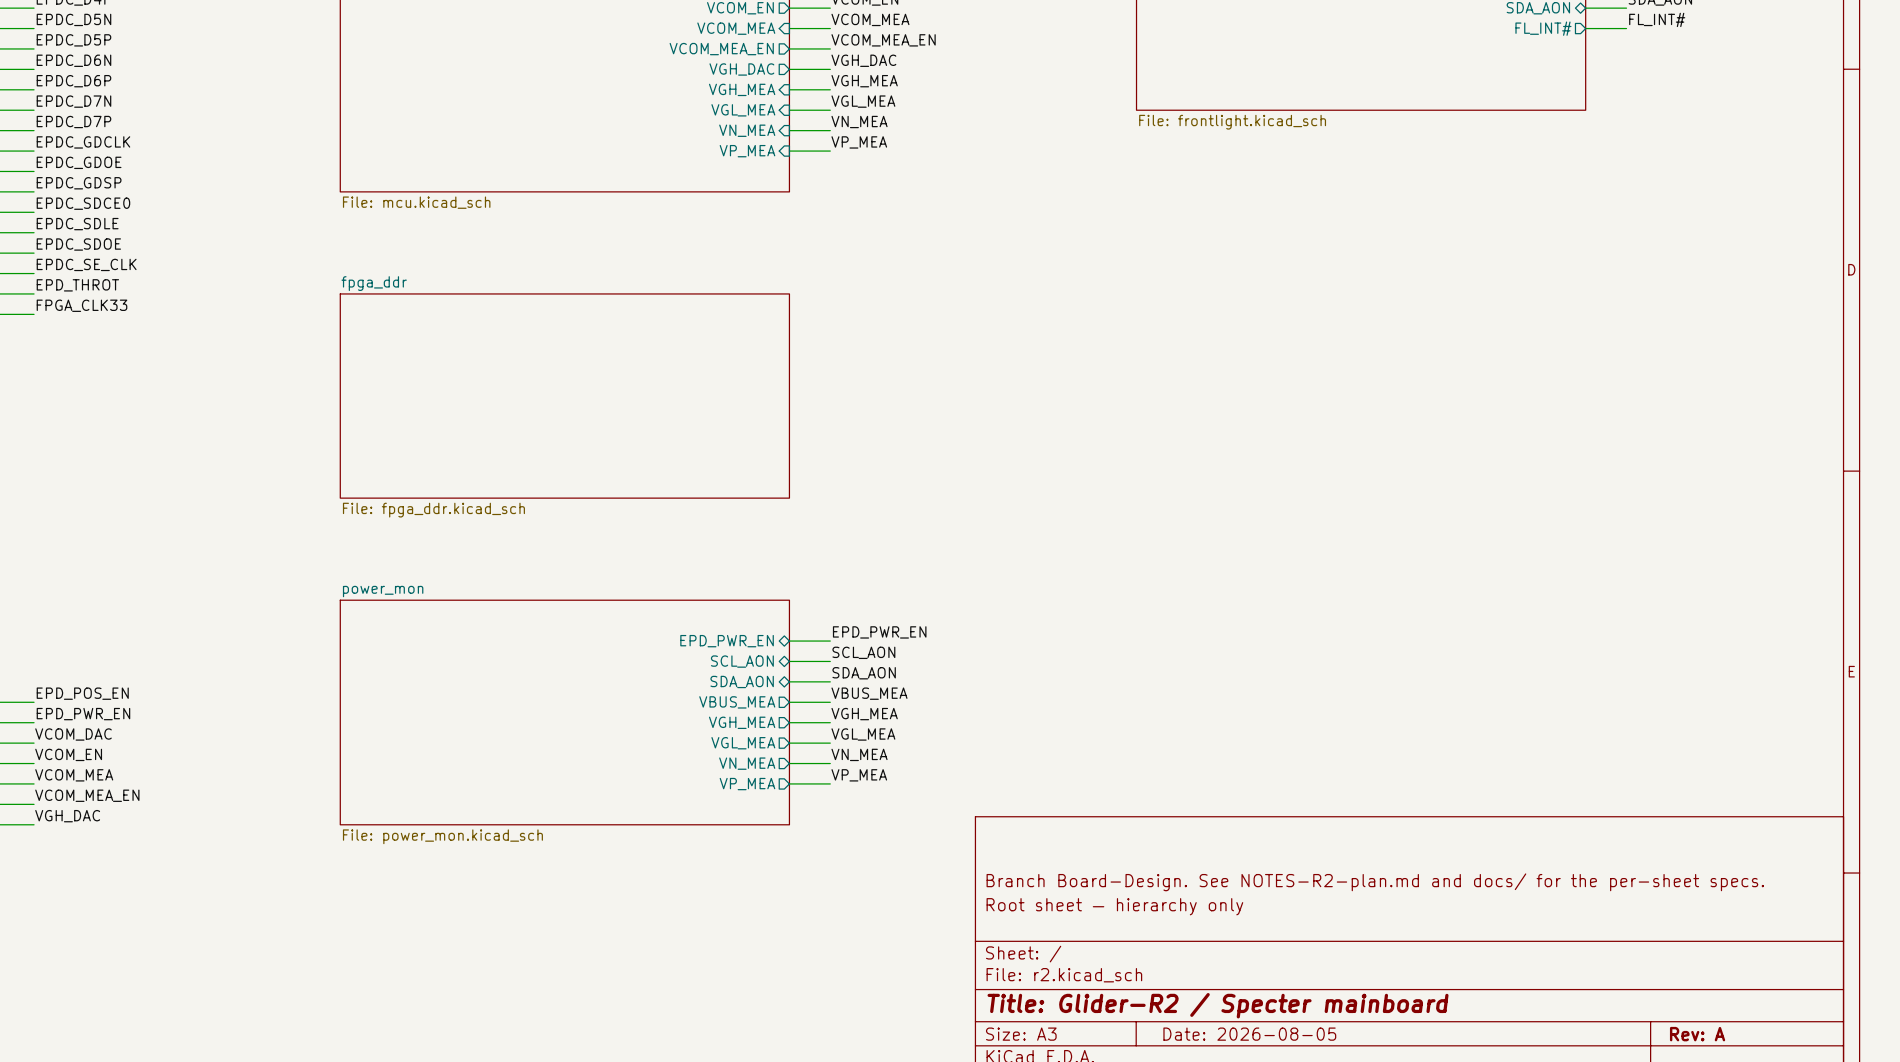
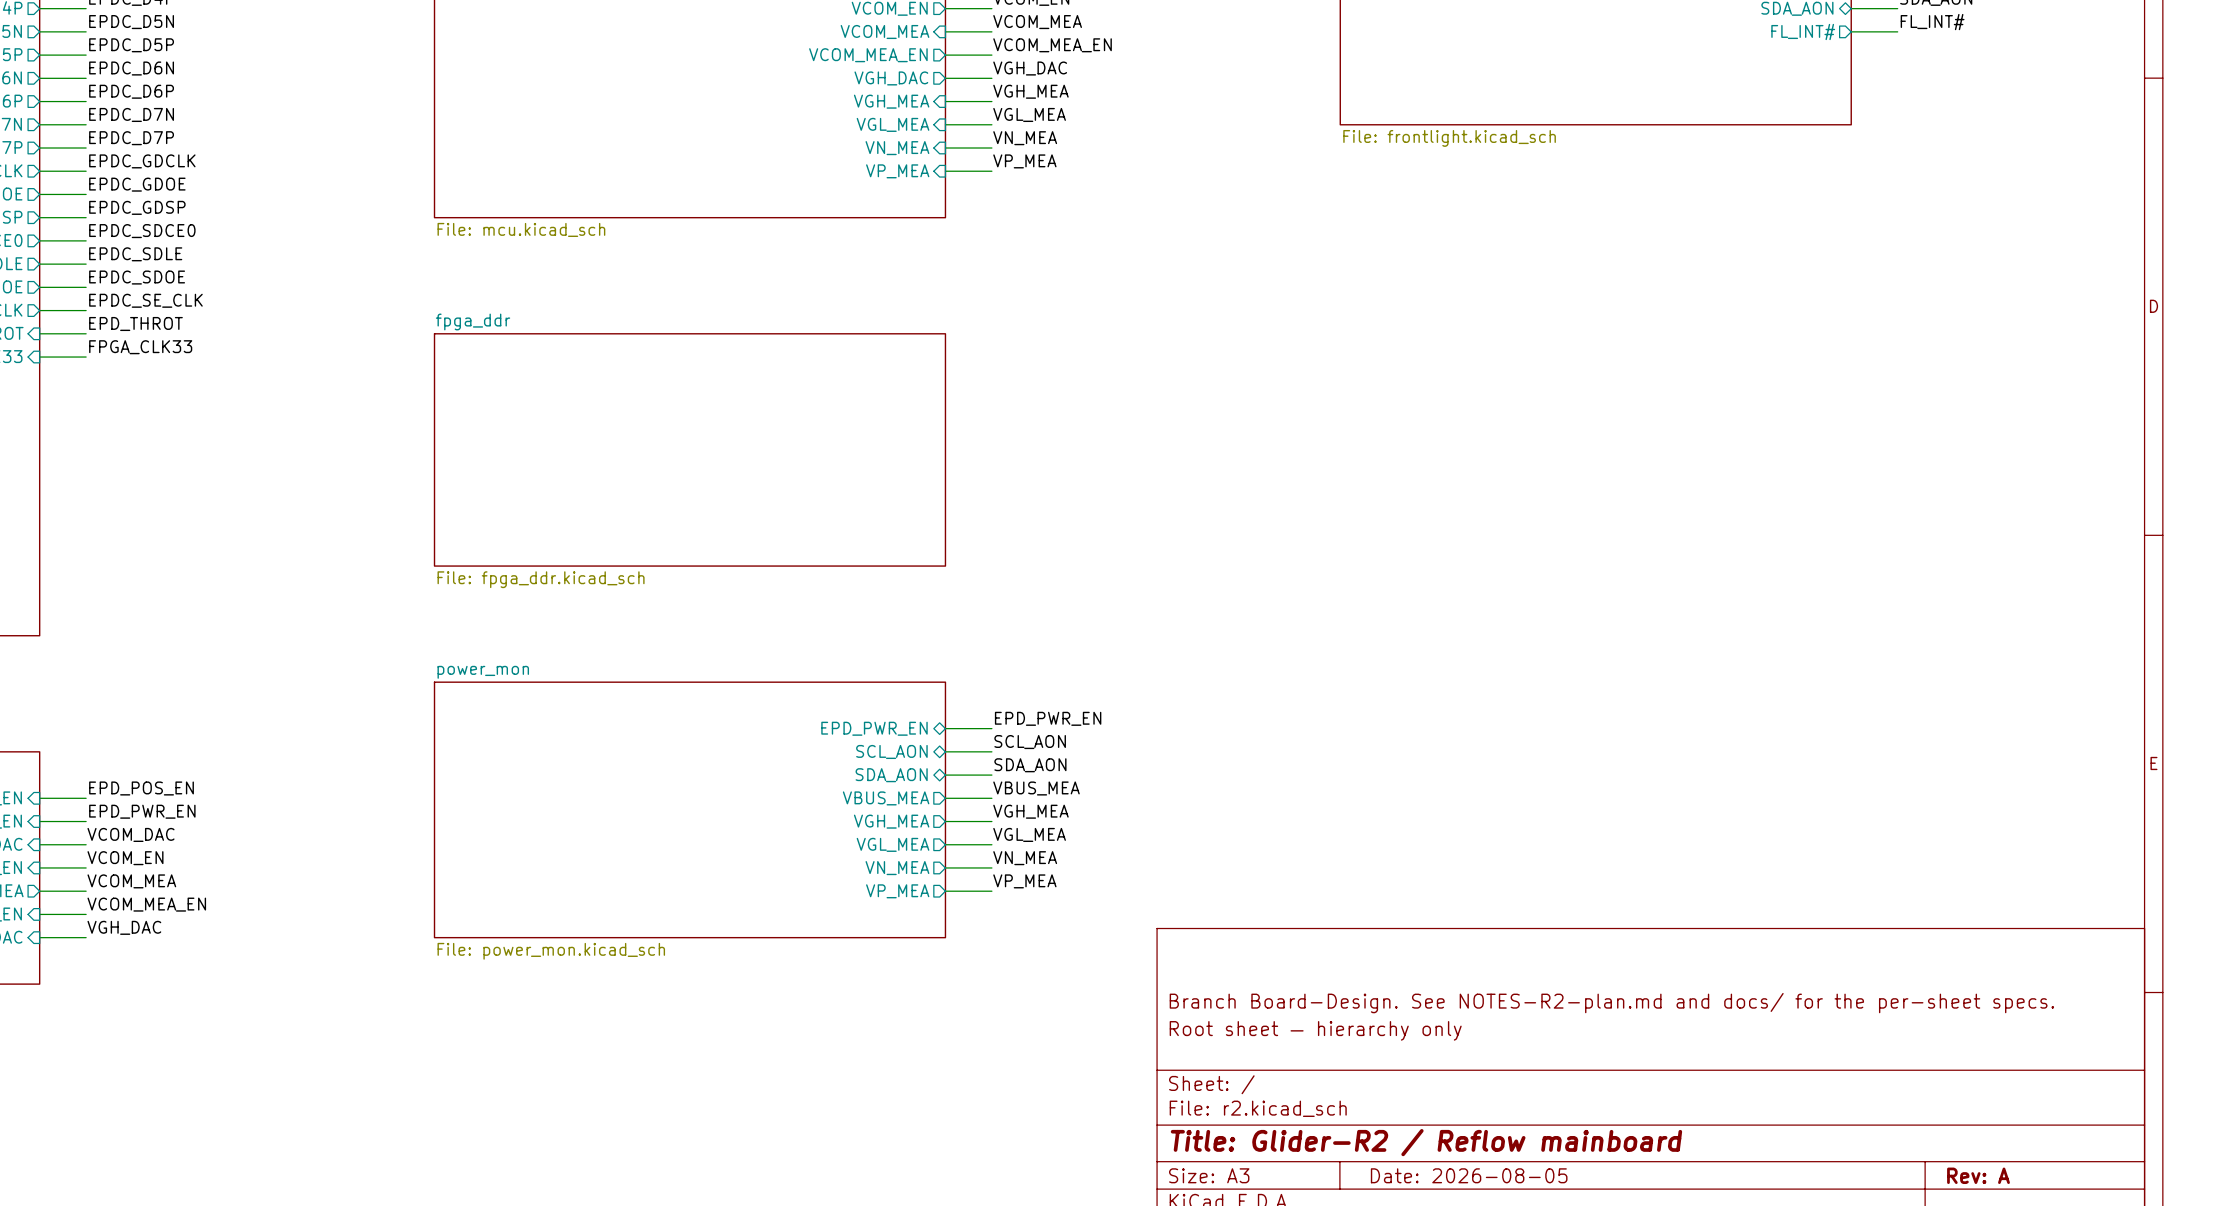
title block: Title: Glider-R2 / Specter mainboard (1218, 1005) -> Title: Glider-R2 / Reflow mainboard (1426, 1142)

